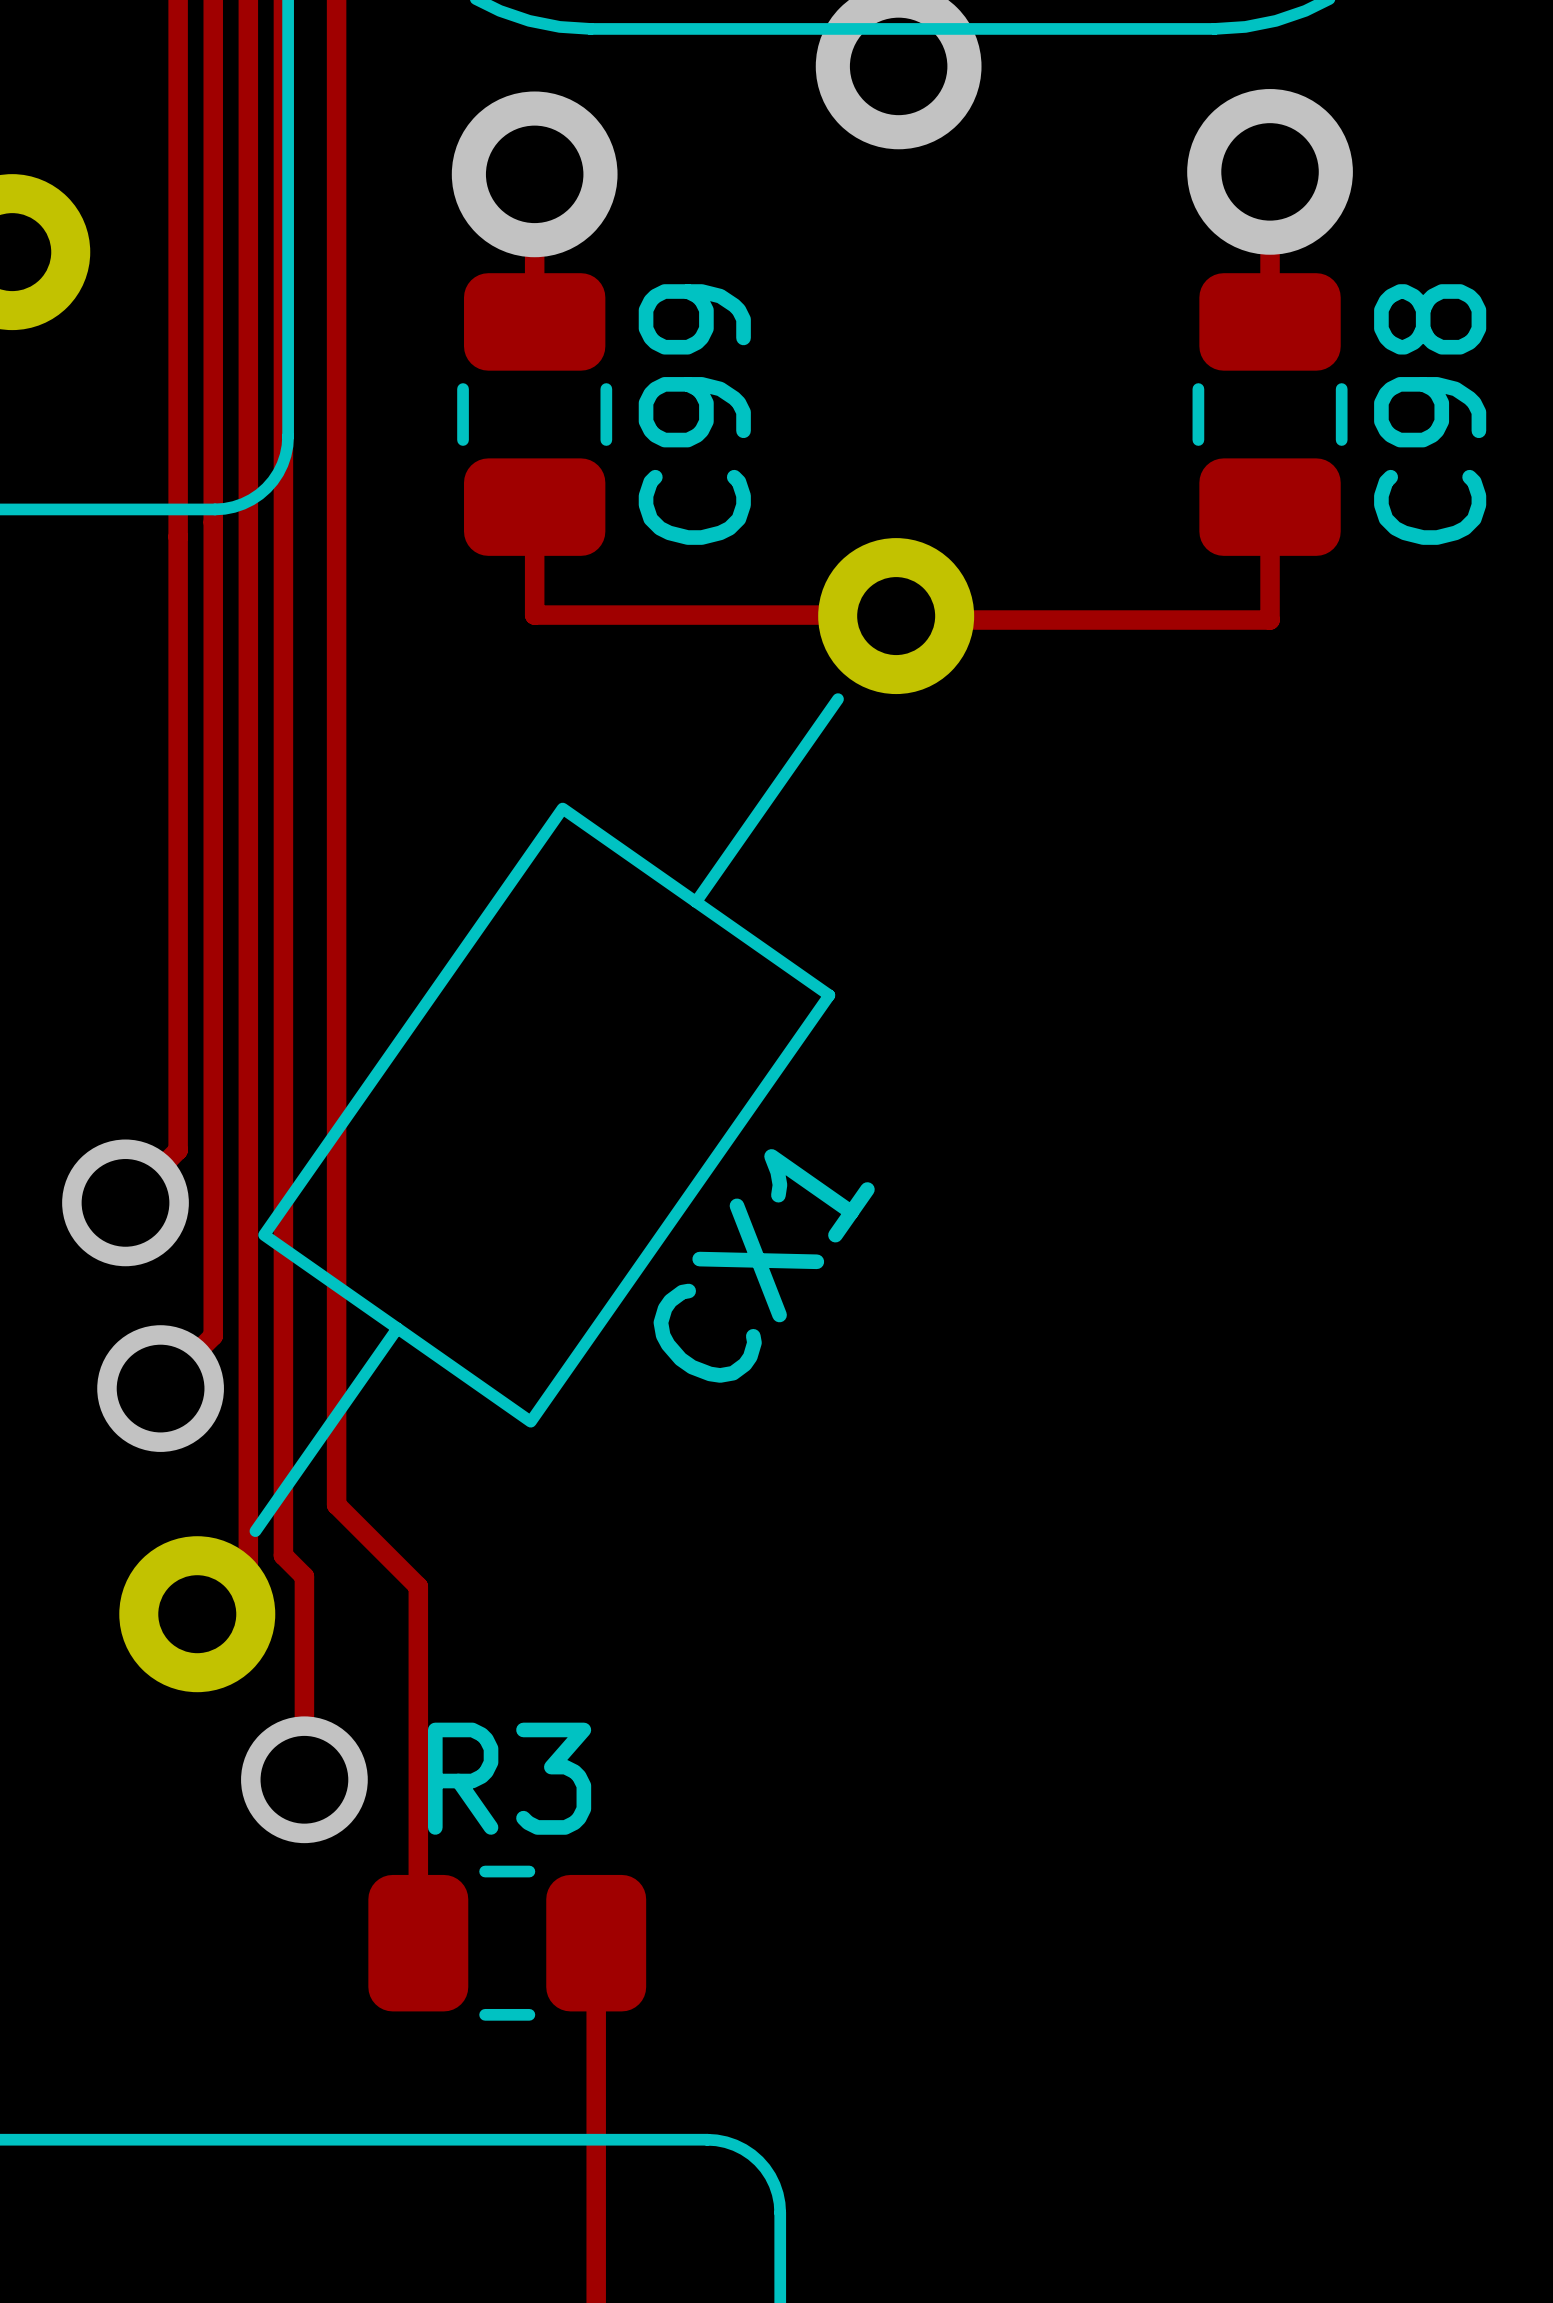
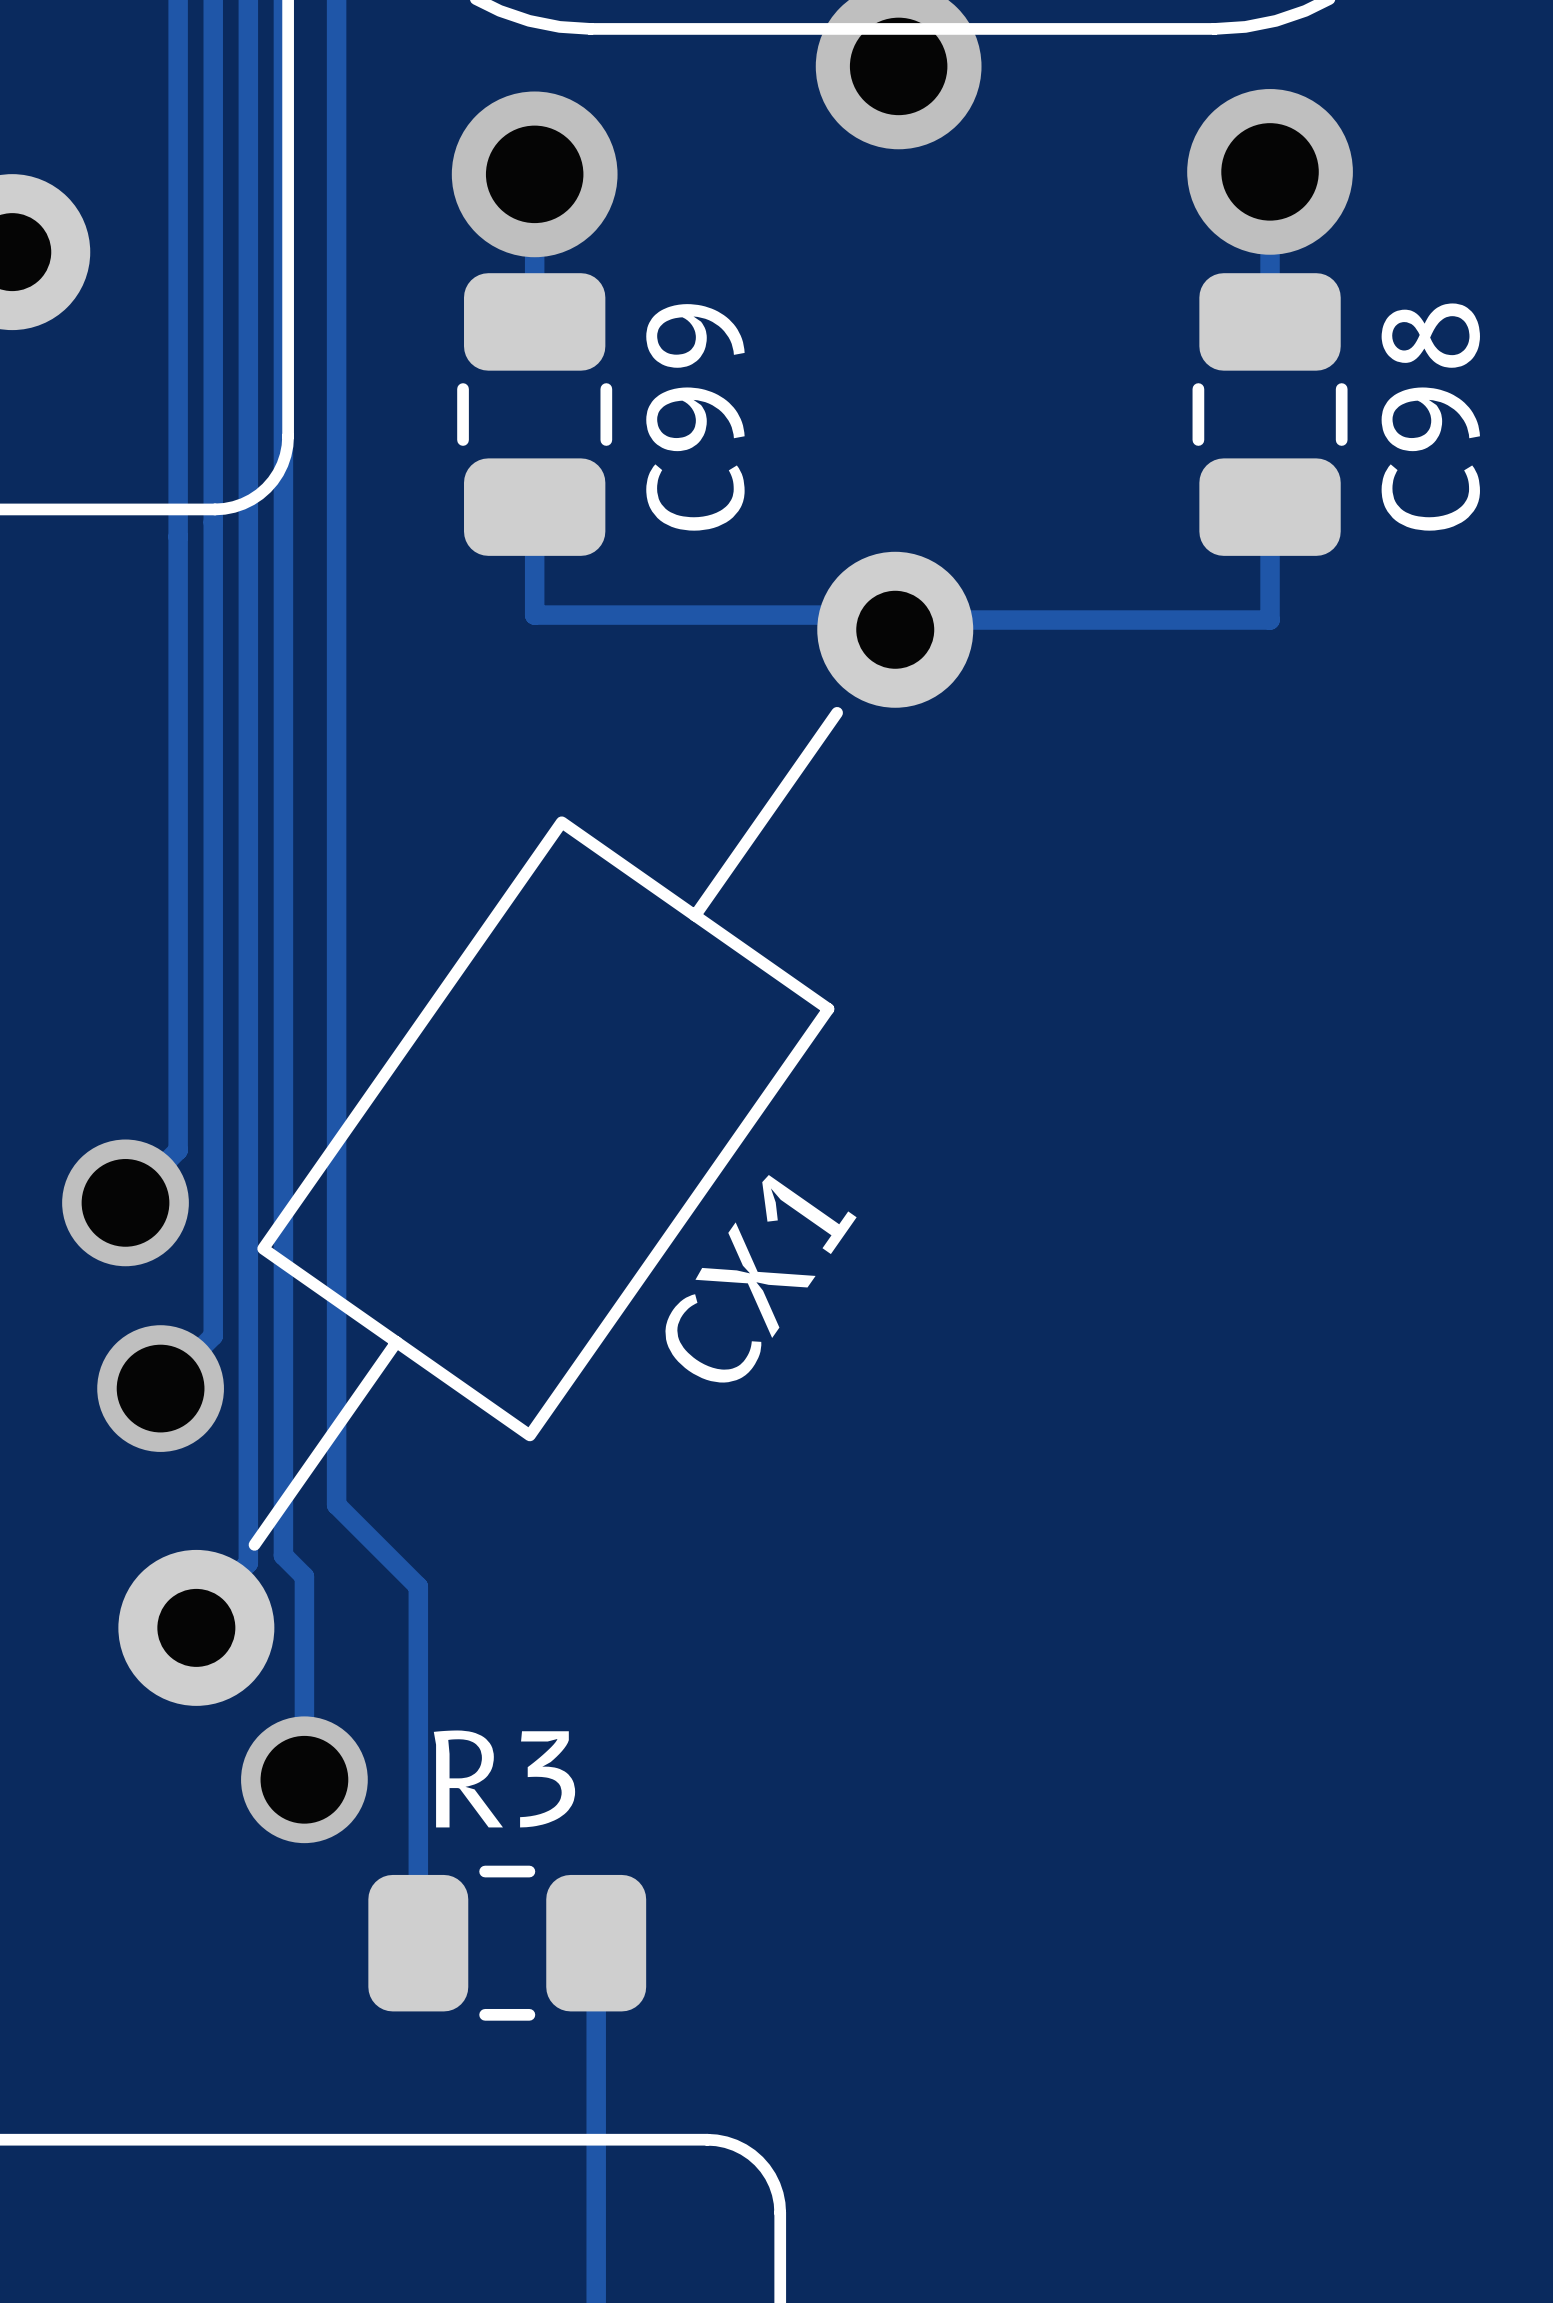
CX1 position: (546, 1115) -> (545, 1128)

